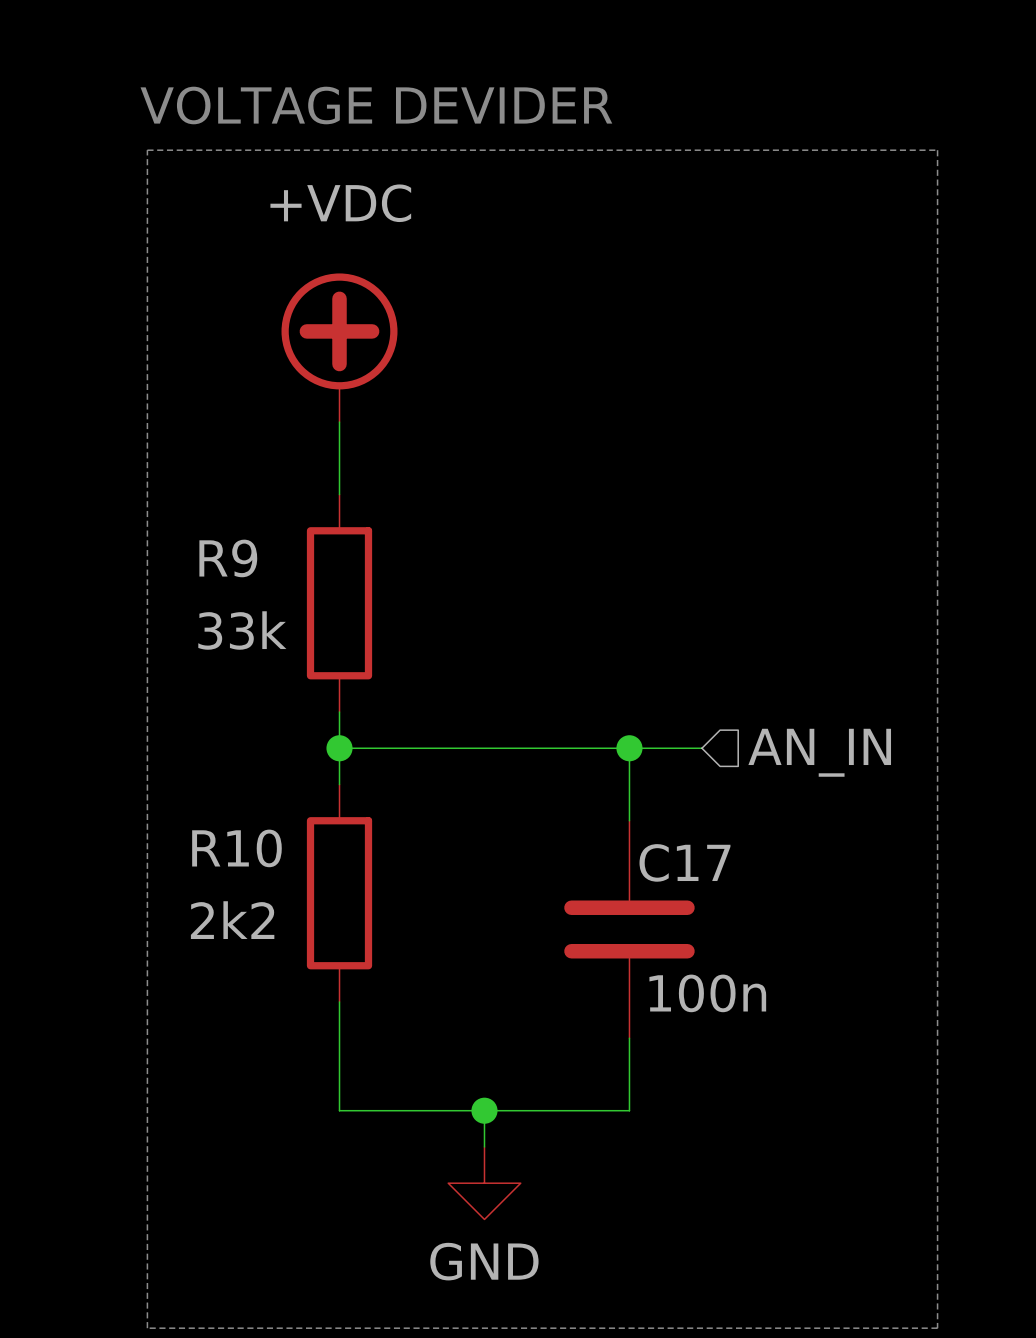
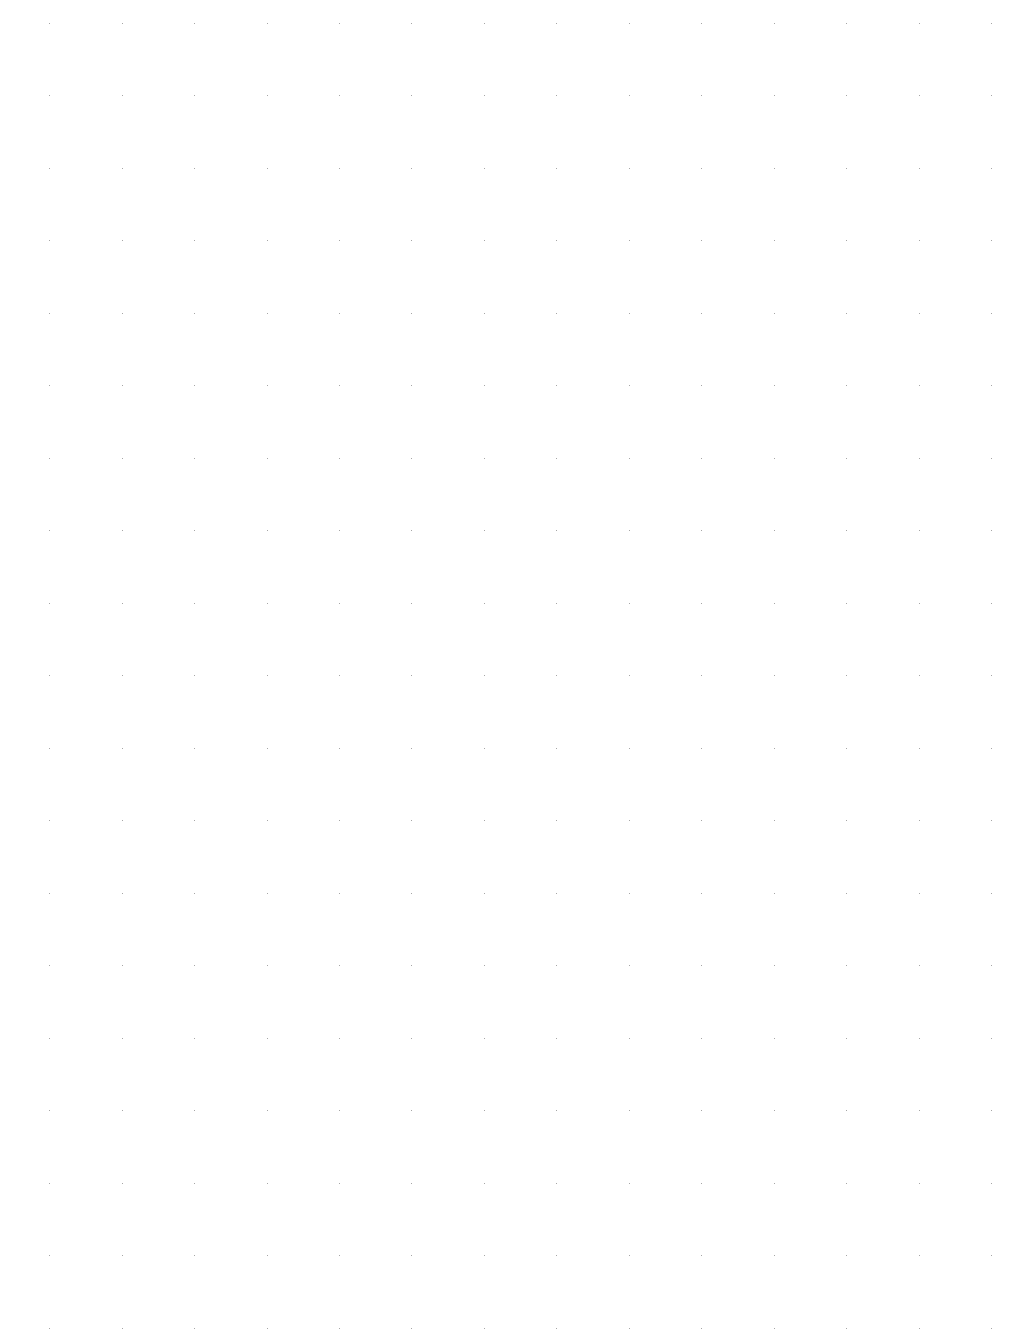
text: VOLTAGE DEVIDER (376, 105) -> none
line: (147, 150) (937, 150) (937, 1328) (147, 1328) (147, 150) -> none
power symbol: +VDC (339, 347) -> none
wire: (339, 422) (339, 494) -> none
R9: 33k (339, 603) -> none
wire: (339, 712) (339, 784) -> none
wire: (339, 748) (701, 748) -> none
junction: (339, 748) -> none
wire: (629, 748) (629, 820) -> none
junction: (629, 748) -> none
hierarchical label: AN_IN (819, 752) -> none
R10: 2k2 (339, 893) -> none
C17: 100n (629, 929) -> none
wire: (339, 1001) (339, 1110) (629, 1110) (629, 1038) -> none
wire: (484, 1110) (484, 1146) -> none
junction: (484, 1110) -> none
power symbol: GND (484, 1183) -> none

